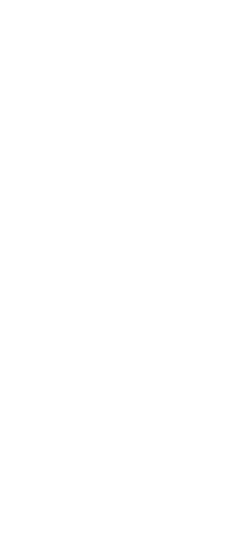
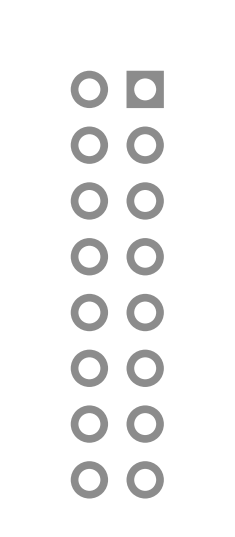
part: none -> (117, 284)

